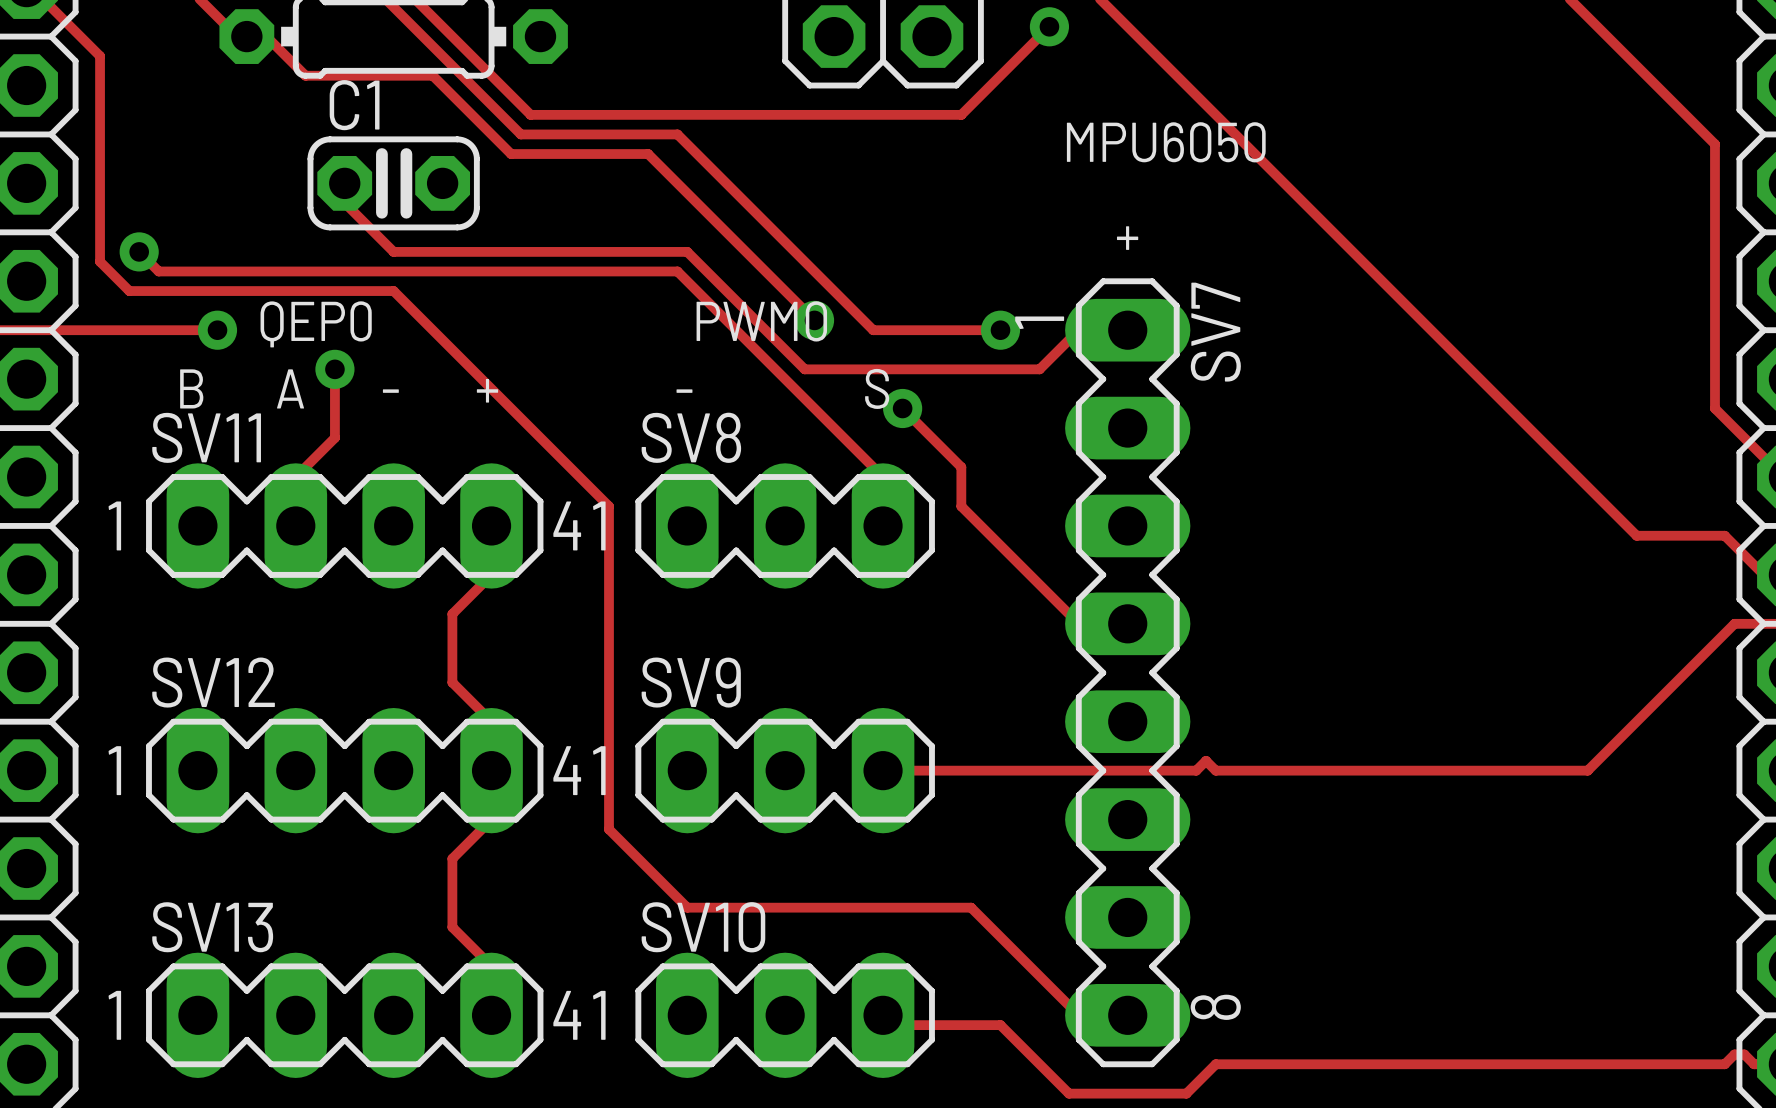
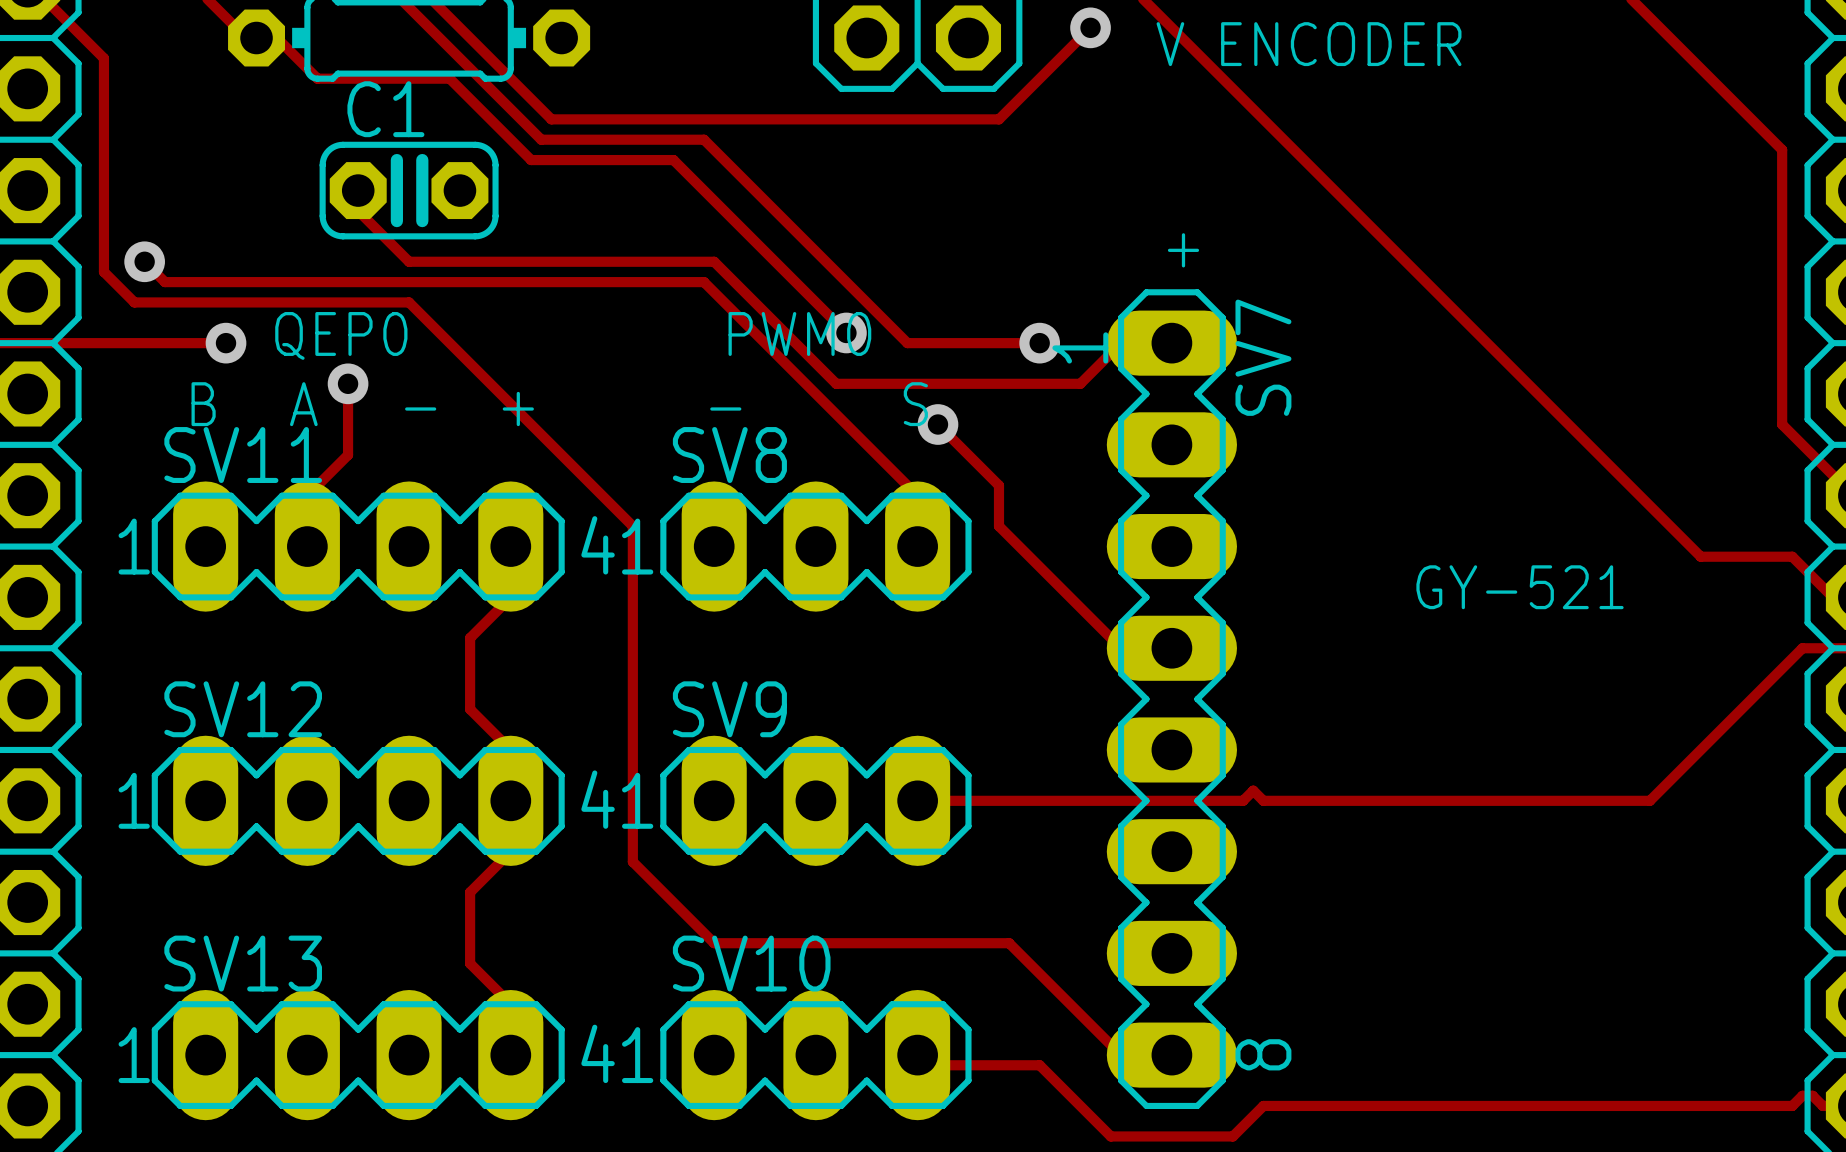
text: none -> V ENCODER (1309, 44)
text: MPU6050 (1166, 142) -> none
text: none -> GY-521 (1520, 587)

